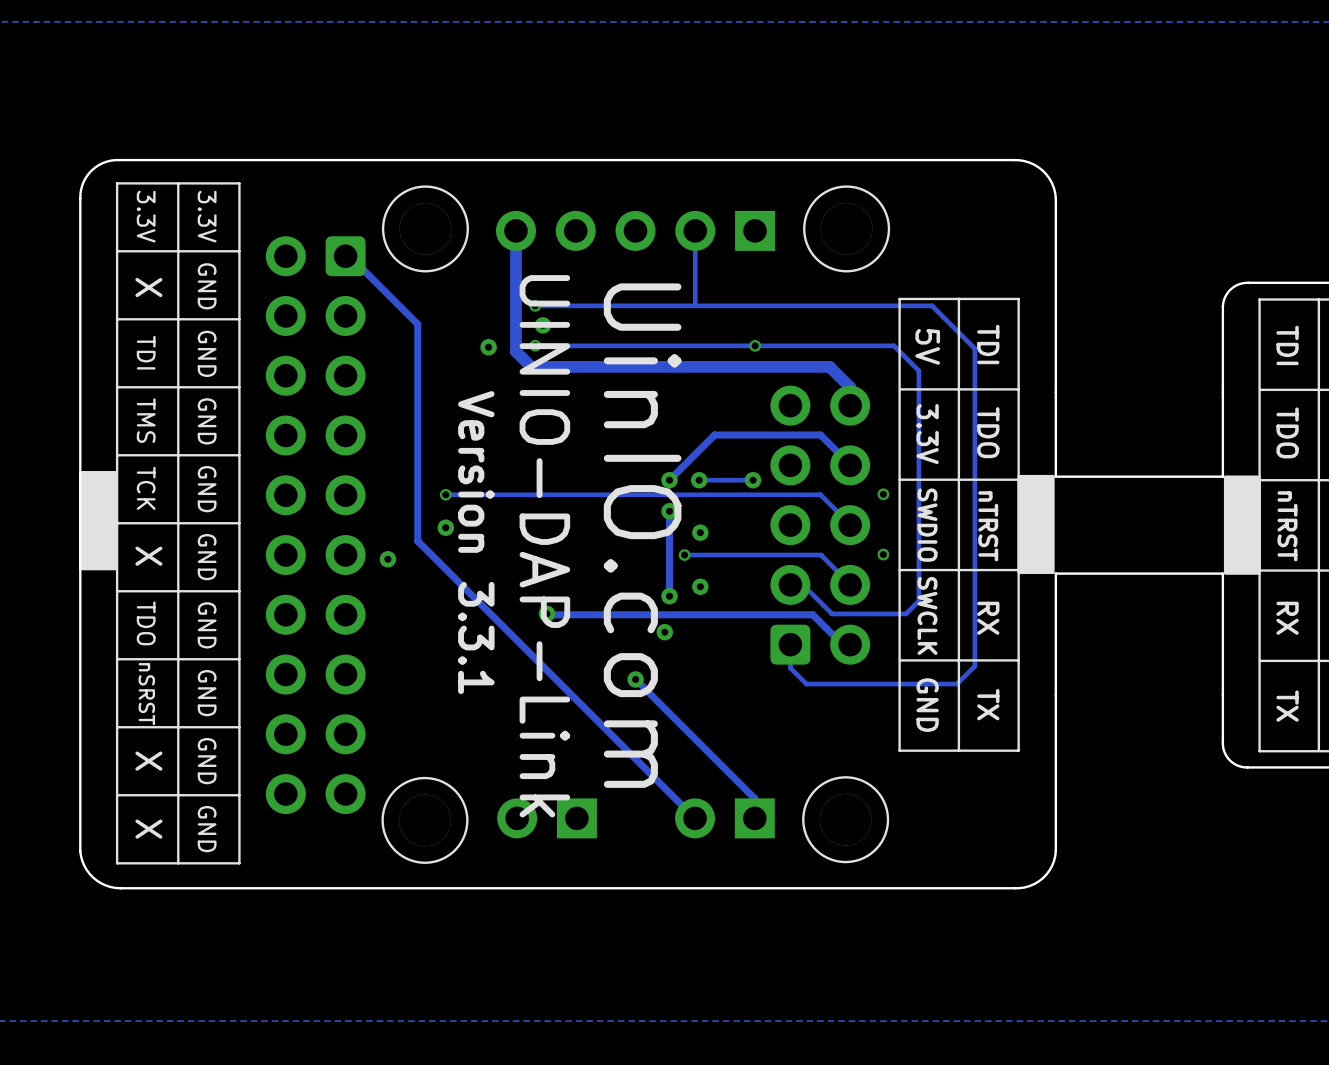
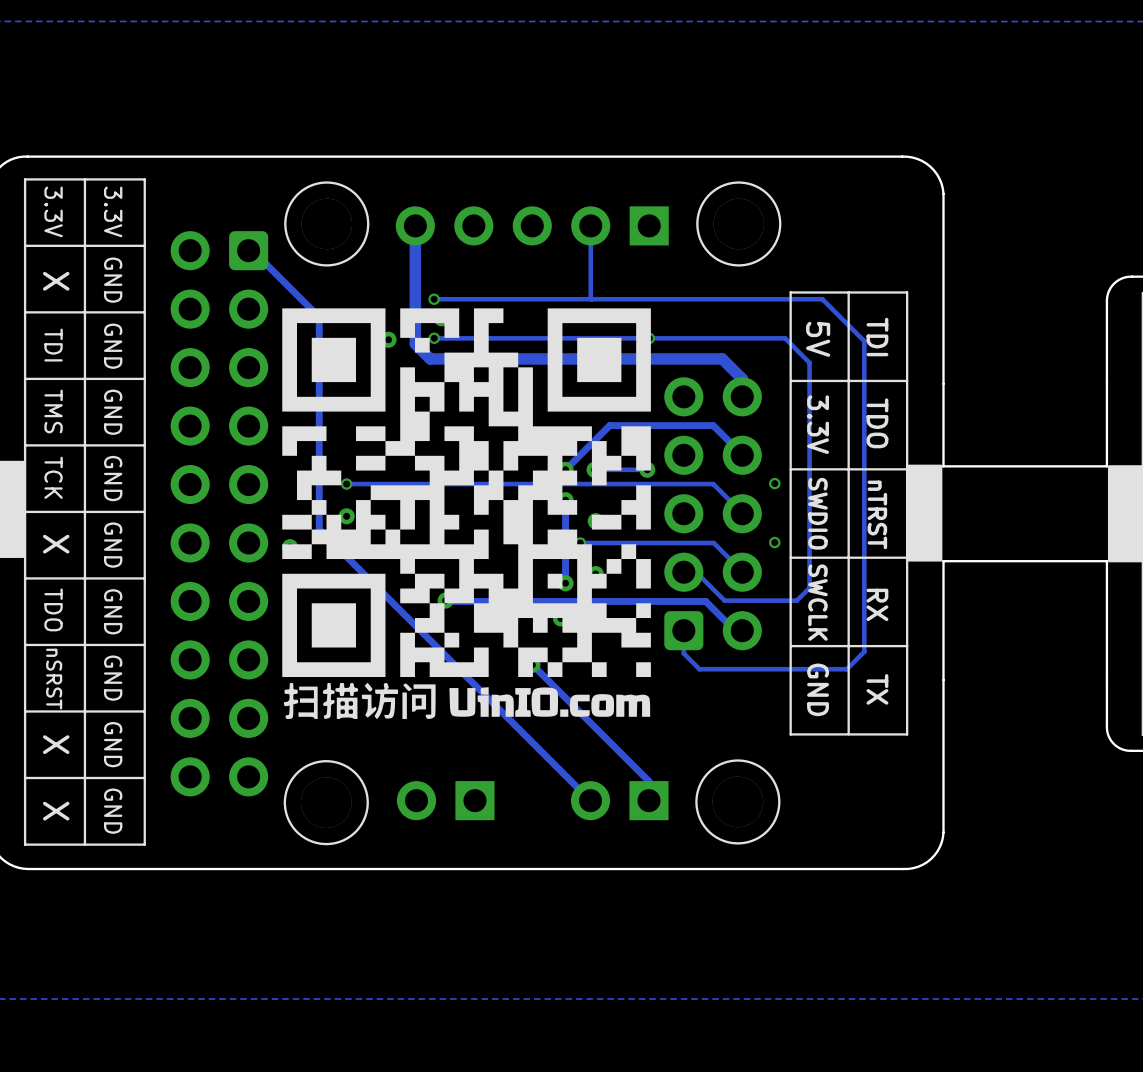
drawing: none -> [282, 308, 651, 720]
text: UinIO.com (642, 535) -> none
text: Version 3.3.1 (476, 542) -> none
text: UINIO-DAP-Link (544, 546) -> none

